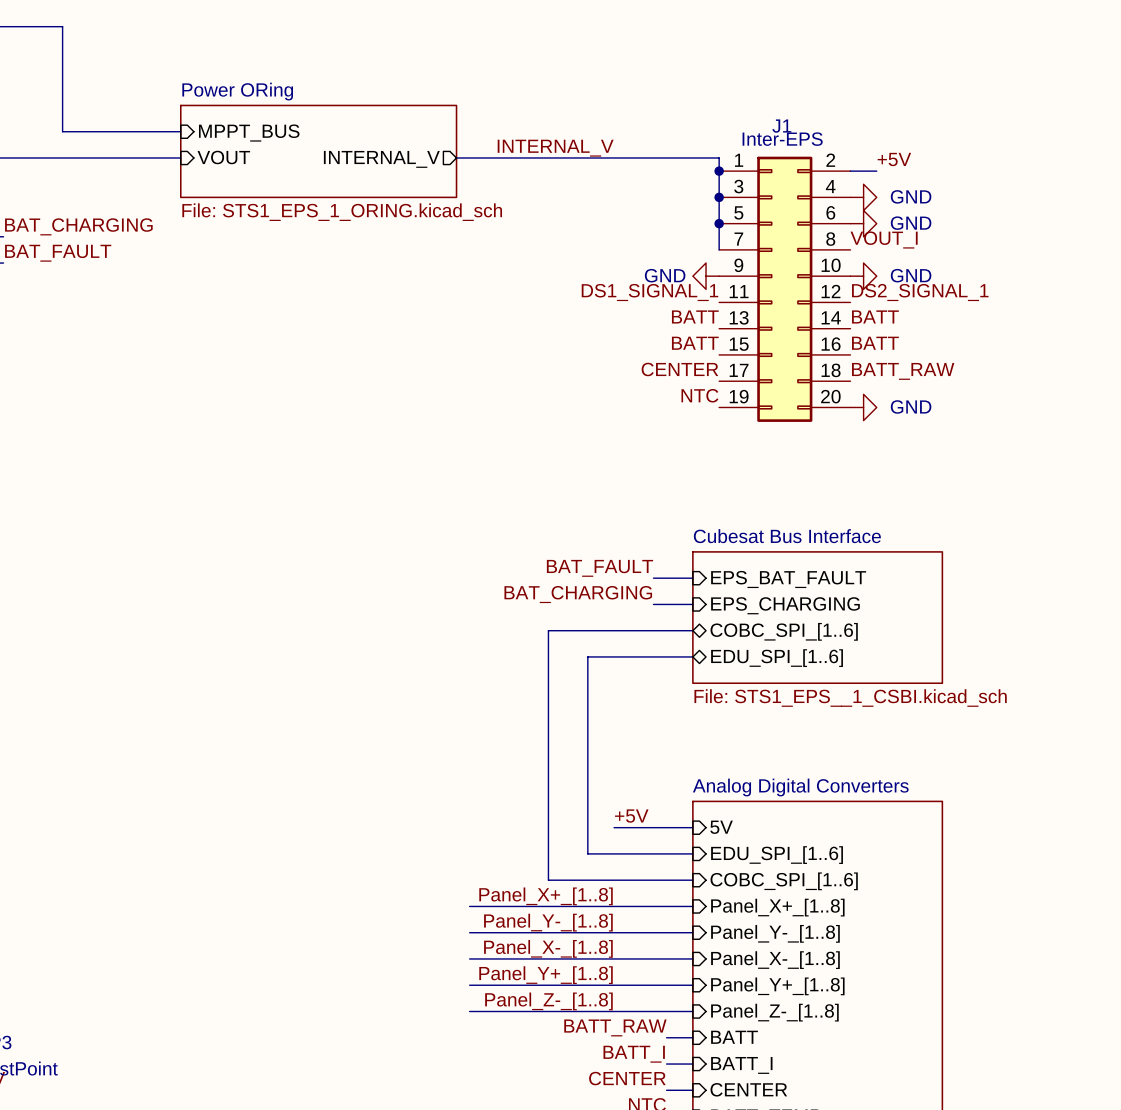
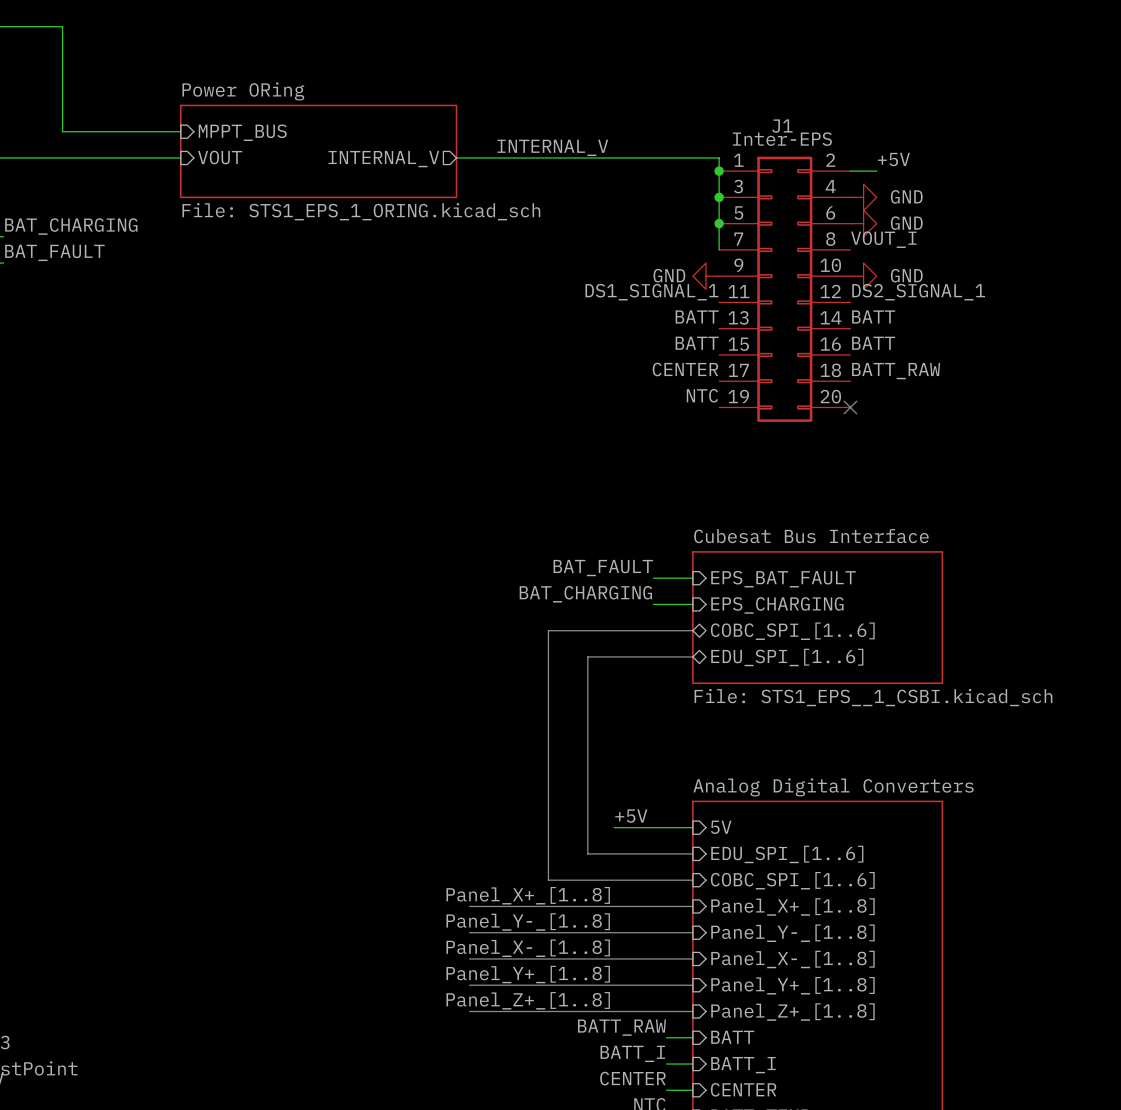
no-connect mark: none -> (850, 407)
power symbol: GND (863, 407) -> none
label: Panel_Z-_[1..8] (548, 1001) -> Panel_Z+_[1..8] (528, 1000)
sheet pin: Panel_Z-_[1..8] (774, 1012) -> Panel_Z+_[1..8] (792, 1012)

